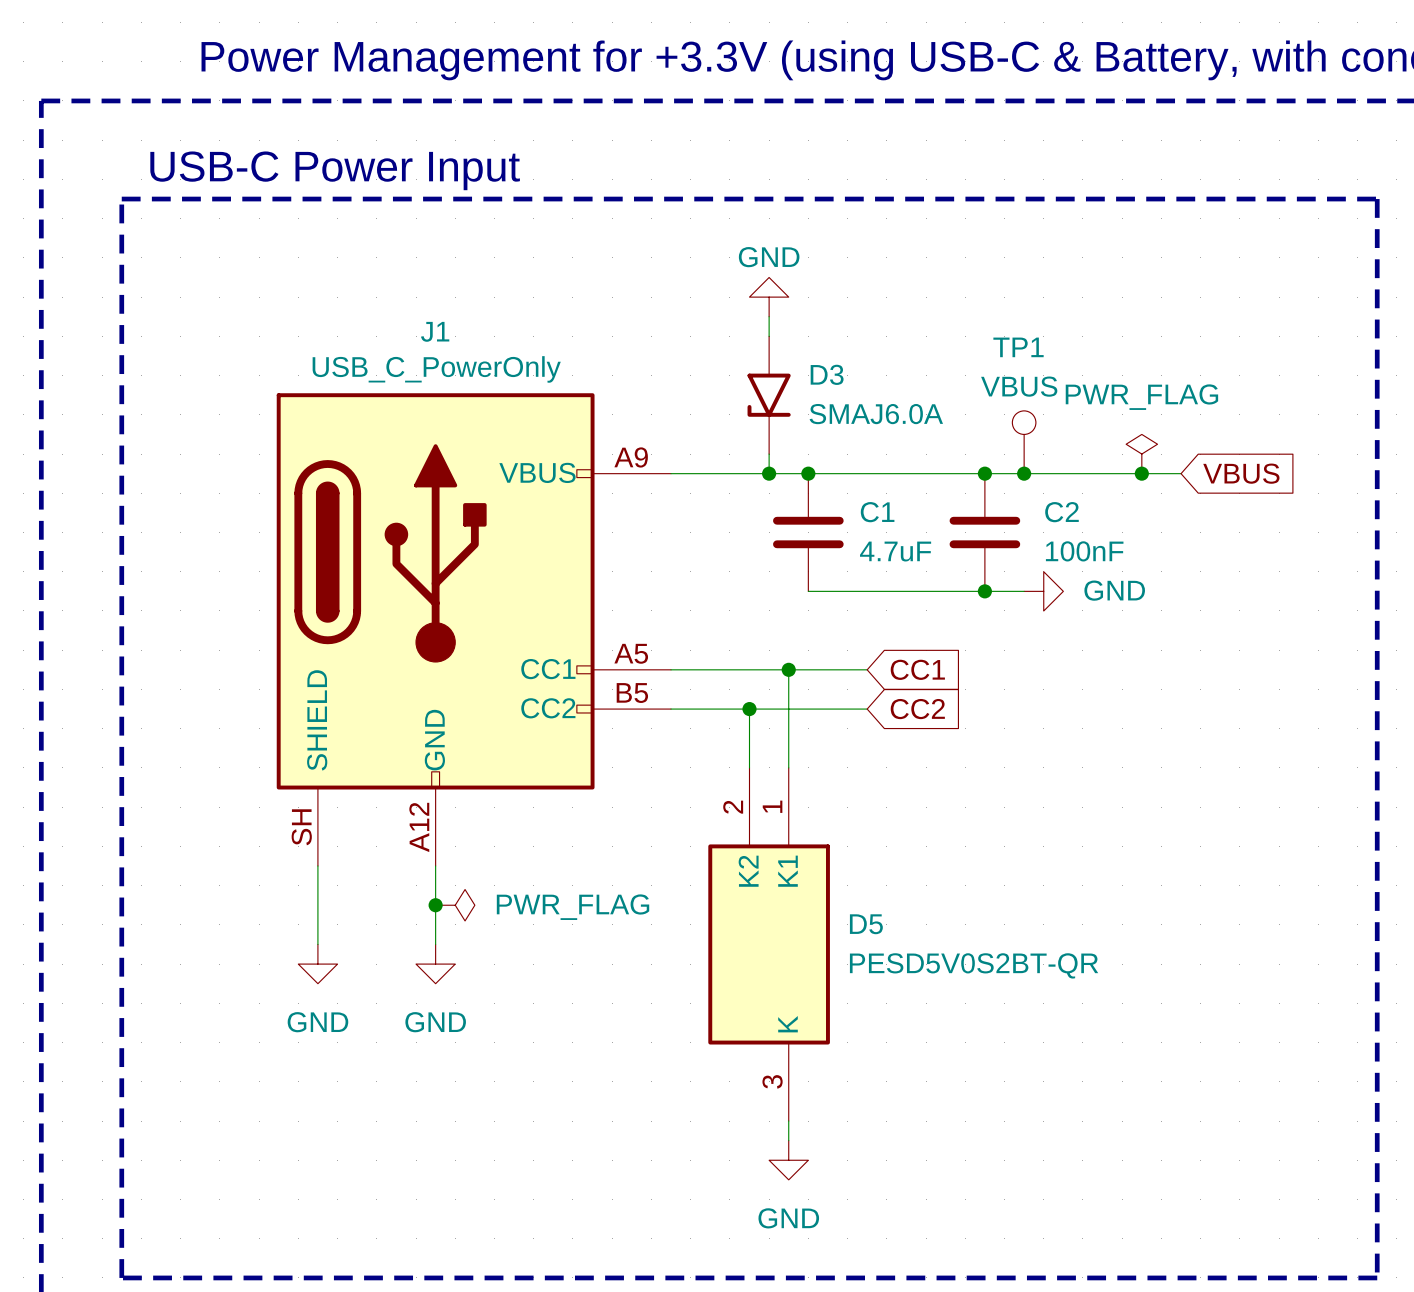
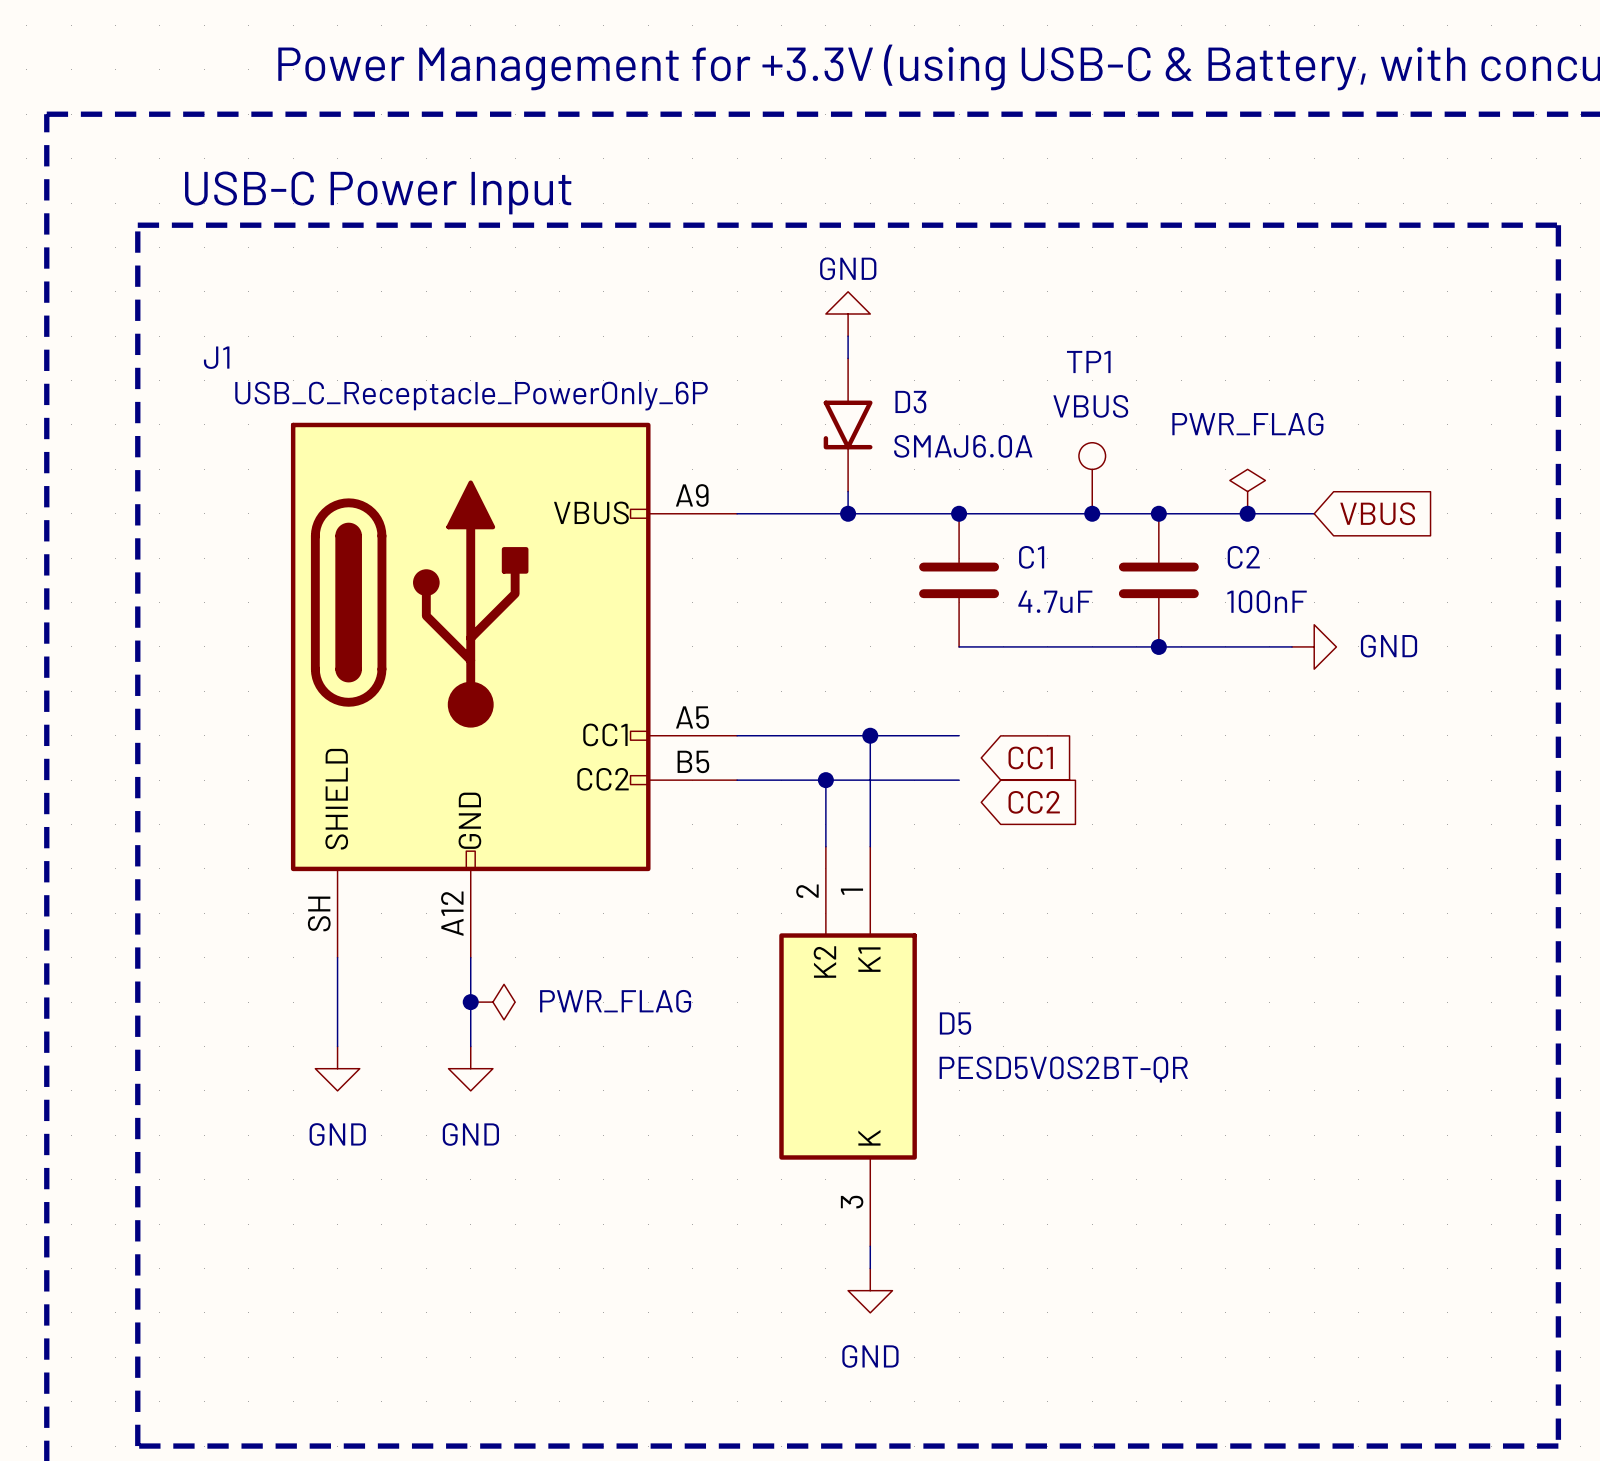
power symbol position: GND (769, 297) -> GND (848, 314)
wire: (769, 316) (769, 336) -> (848, 336) (848, 358)
J1 name position: J1 (435, 331) -> J1 (216, 357)
TP1 name position: TP1 (1018, 347) -> TP1 (1088, 361)
J1 value: USB_C_PowerOnly (436, 369) -> USB_C_Receptacle_PowerOnly_6P (471, 396)
TP1 value position: VBUS (1019, 386) -> VBUS (1090, 406)
D3 position: (769, 395) -> (848, 424)
TP1 position: (1024, 442) -> (1092, 478)
wire: (769, 454) (769, 473) -> (848, 491) (848, 513)
junction: none -> (959, 513)
junction: none -> (1092, 513)
junction: none -> (1247, 513)
power symbol position: PWR_FLAG (1141, 454) -> PWR_FLAG (1247, 491)
wire: (671, 473) (1181, 473) -> (737, 513) (1314, 513)
junction position: (769, 473) -> (848, 513)
junction: (808, 473) -> none
junction: (984, 473) -> none
junction position: (1024, 473) -> (1158, 513)
junction: (1141, 473) -> none
global label position: VBUS (1241, 473) -> VBUS (1377, 513)
C1 position: (808, 532) -> (959, 580)
C2 position: (984, 532) -> (1158, 580)
wire: none -> (959, 646) (1292, 646)
wire: (808, 591) (1024, 591) -> none
junction position: (984, 591) -> (1158, 646)
power symbol position: GND (1043, 591) -> GND (1314, 646)
J1 position: (473, 629) -> (514, 690)
wire: (671, 669) (867, 669) -> (737, 735) (959, 735)
wire: (788, 669) (788, 767) -> (870, 735) (870, 846)
junction position: (788, 669) -> (870, 735)
wire: (671, 709) (867, 709) -> (737, 780) (959, 780)
wire: (749, 709) (749, 767) -> (825, 780) (825, 846)
junction position: (749, 709) -> (825, 780)
wire: (317, 866) (317, 944) -> (337, 957) (337, 1046)
wire: (435, 866) (435, 944) -> (470, 957) (470, 1046)
junction position: (435, 905) -> (470, 1002)
power symbol position: PWR_FLAG (455, 905) -> PWR_FLAG (492, 1002)
D5 position: (769, 944) -> (848, 1046)
power symbol position: GND (317, 964) -> GND (337, 1068)
power symbol position: GND (435, 964) -> GND (470, 1068)
wire: (788, 1121) (788, 1140) -> (870, 1246) (870, 1268)
power symbol position: GND (788, 1160) -> GND (870, 1290)

